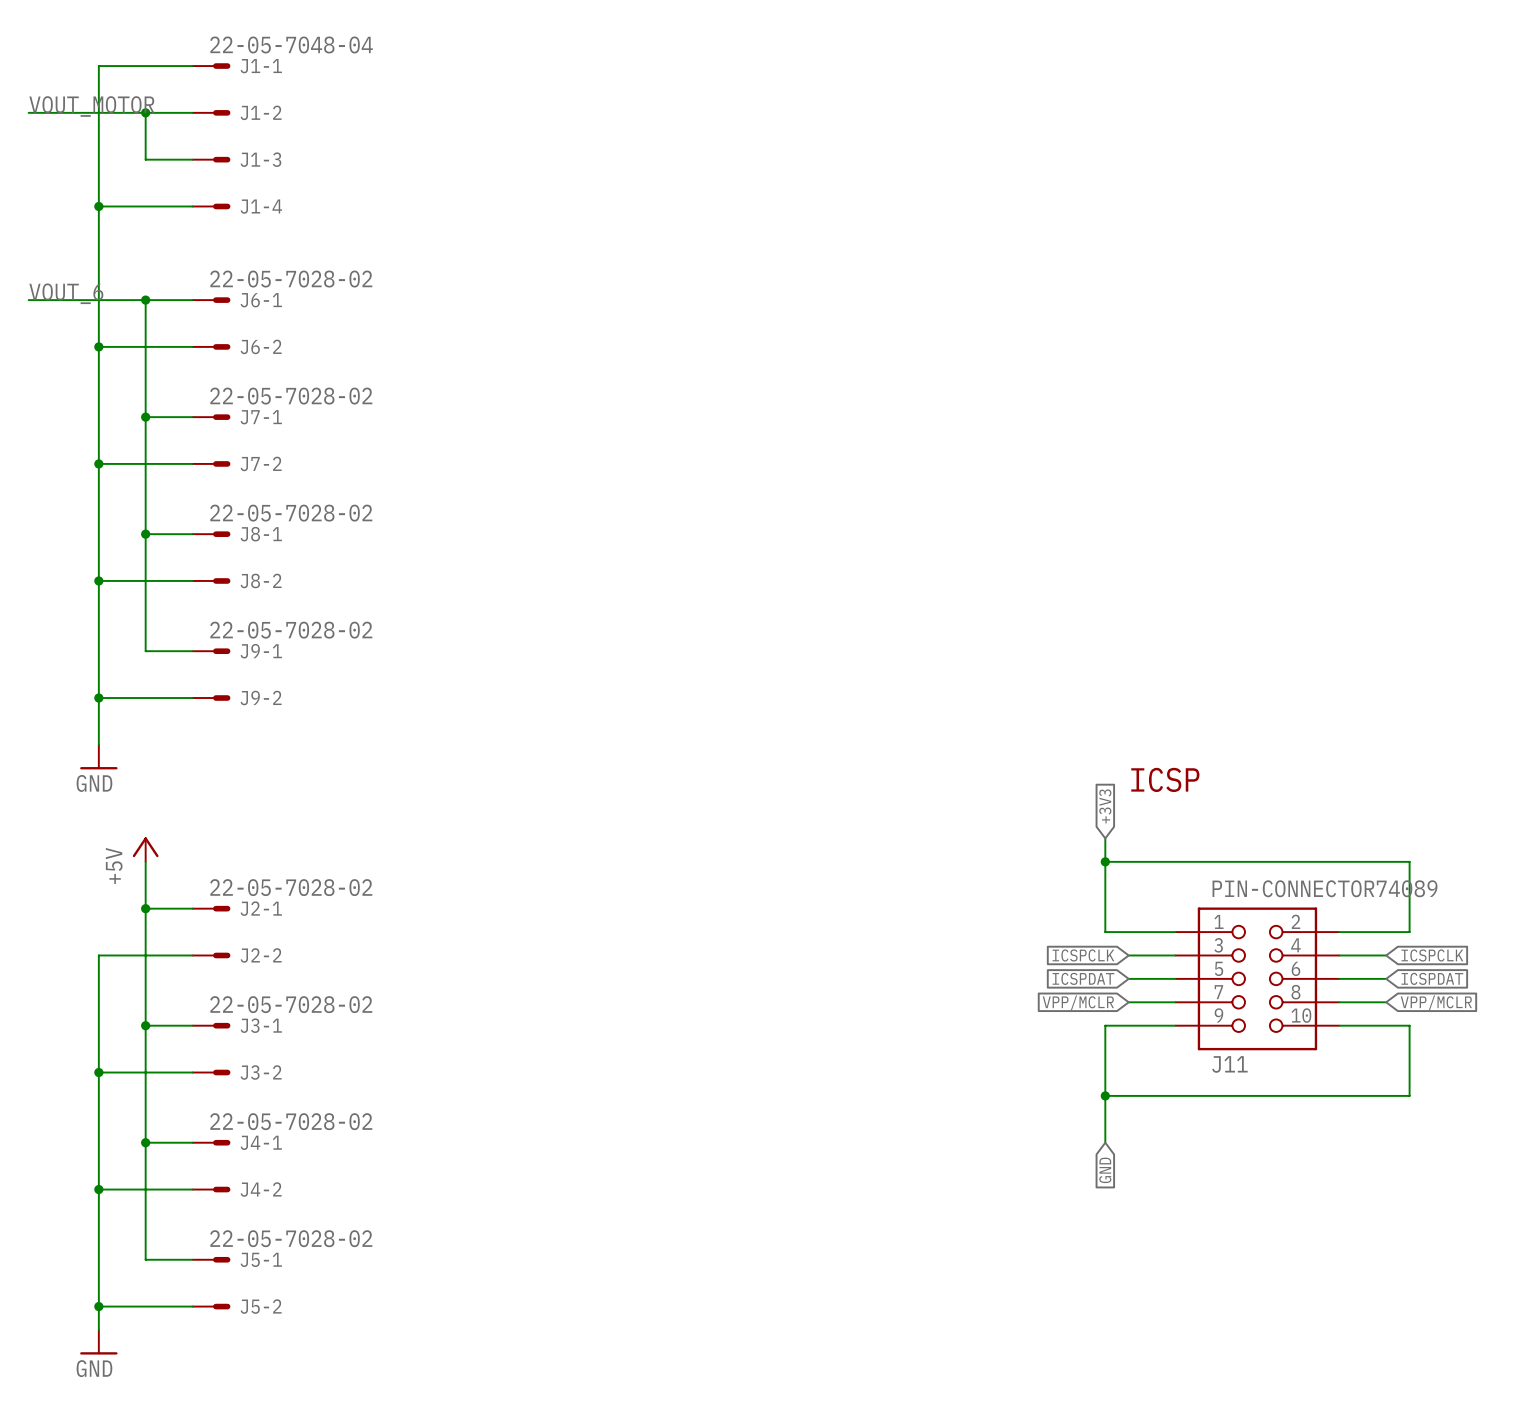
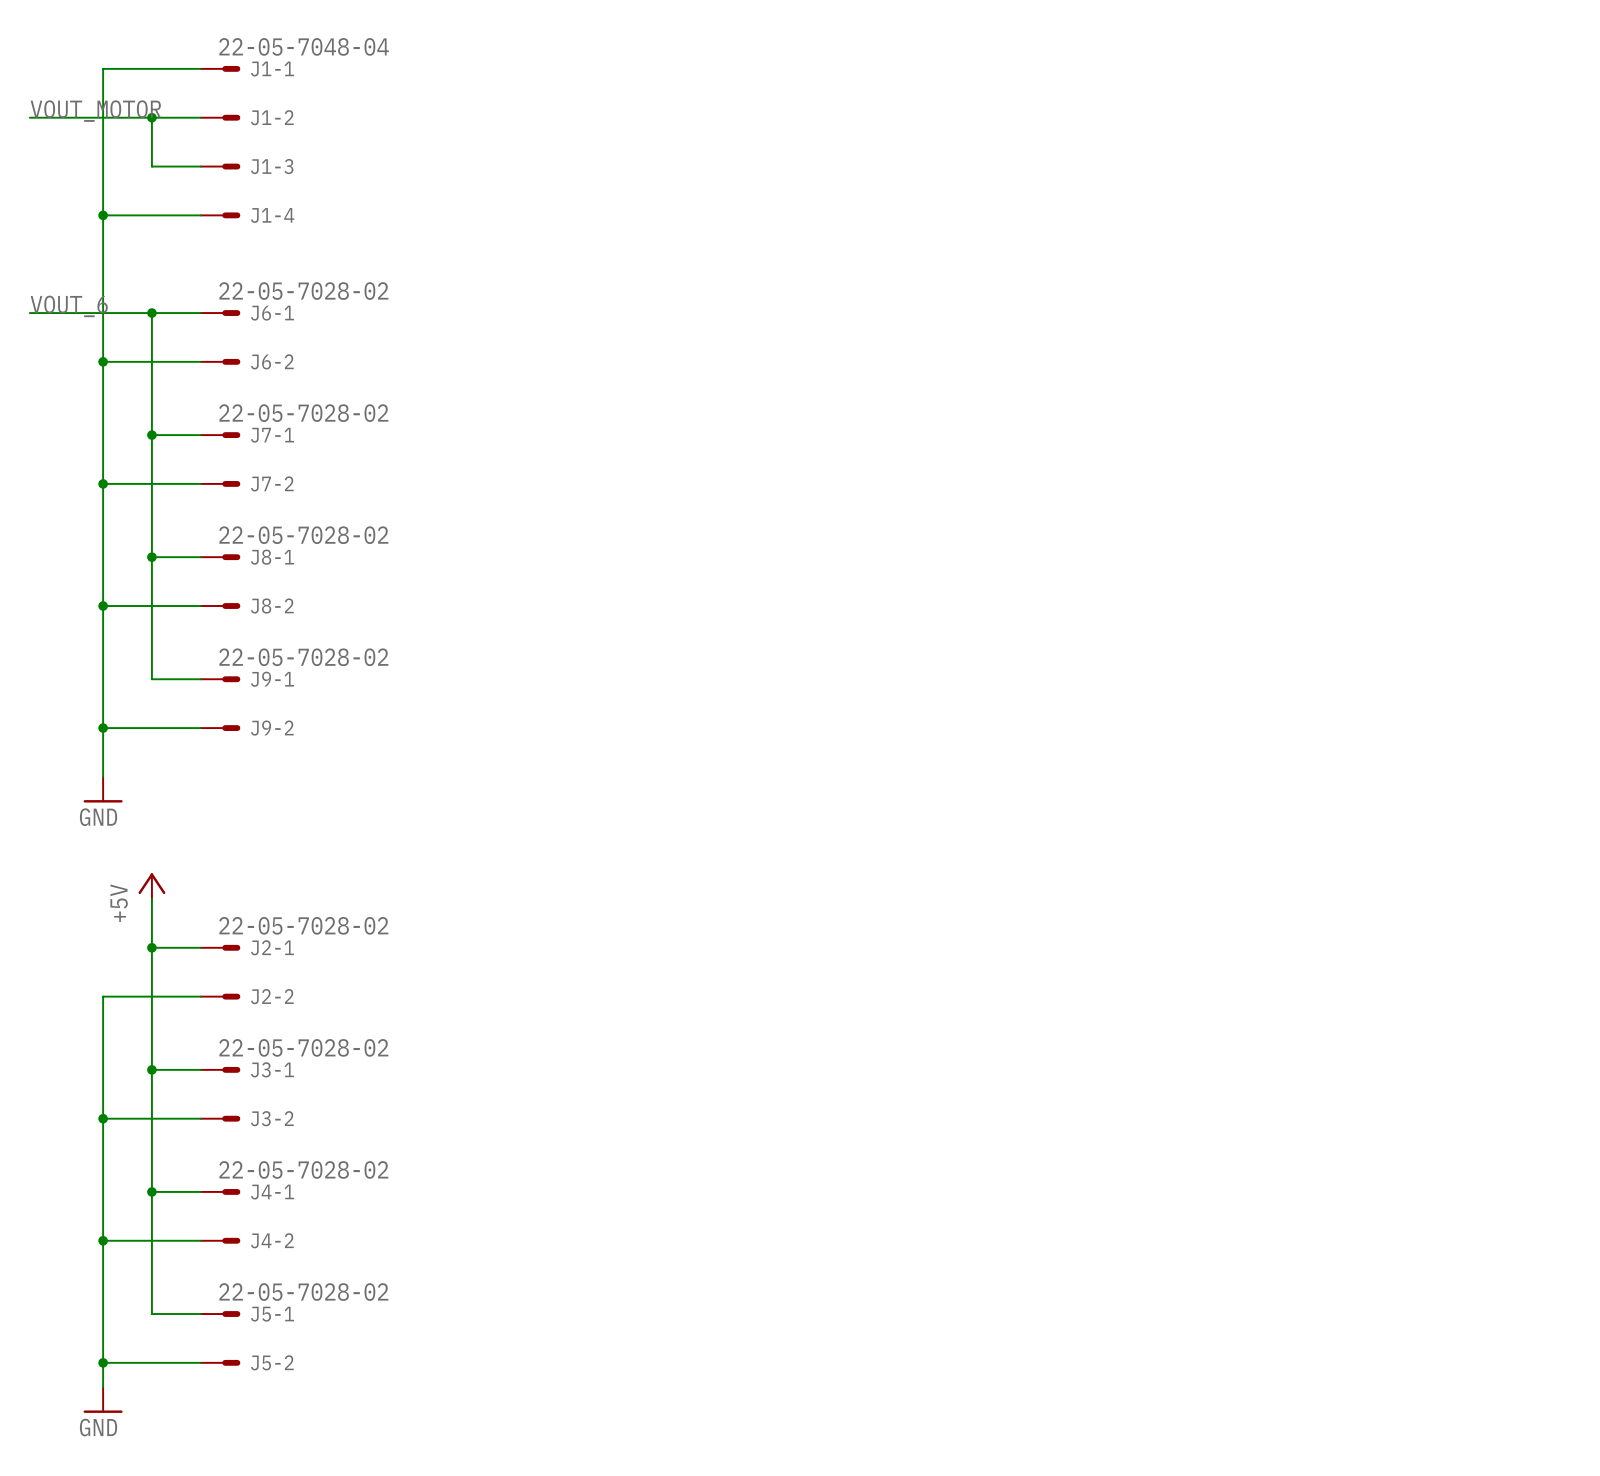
text: ICSP (1165, 779) -> none
global label: +3V3 (1105, 806) -> none
wire: (1105, 838) (1105, 932) (1175, 932) -> none
wire: (1105, 861) (1409, 861) (1409, 932) (1339, 932) -> none
junction: (1105, 861) -> none
global label: ICSPCLK (1083, 955) -> none
wire: (1128, 955) (1175, 955) -> none
wire: (1339, 955) (1386, 955) -> none
global label: ICSPCLK (1432, 955) -> none
global label: ICSPDAT (1083, 978) -> none
wire: (1128, 978) (1175, 978) -> none
J11: PIN-CONNECTOR74089 (1257, 978) -> none
wire: (1339, 978) (1386, 978) -> none
global label: ICSPDAT (1432, 978) -> none
global label: VPP/MCLR (1078, 1002) -> none
wire: (1128, 1002) (1175, 1002) -> none
wire: (1339, 1002) (1386, 1002) -> none
global label: VPP/MCLR (1436, 1002) -> none
wire: (1175, 1025) (1105, 1025) (1105, 1142) -> none
wire: (1339, 1025) (1409, 1025) (1409, 1095) (1105, 1095) -> none
junction: (1105, 1095) -> none
global label: GND (1105, 1170) -> none

